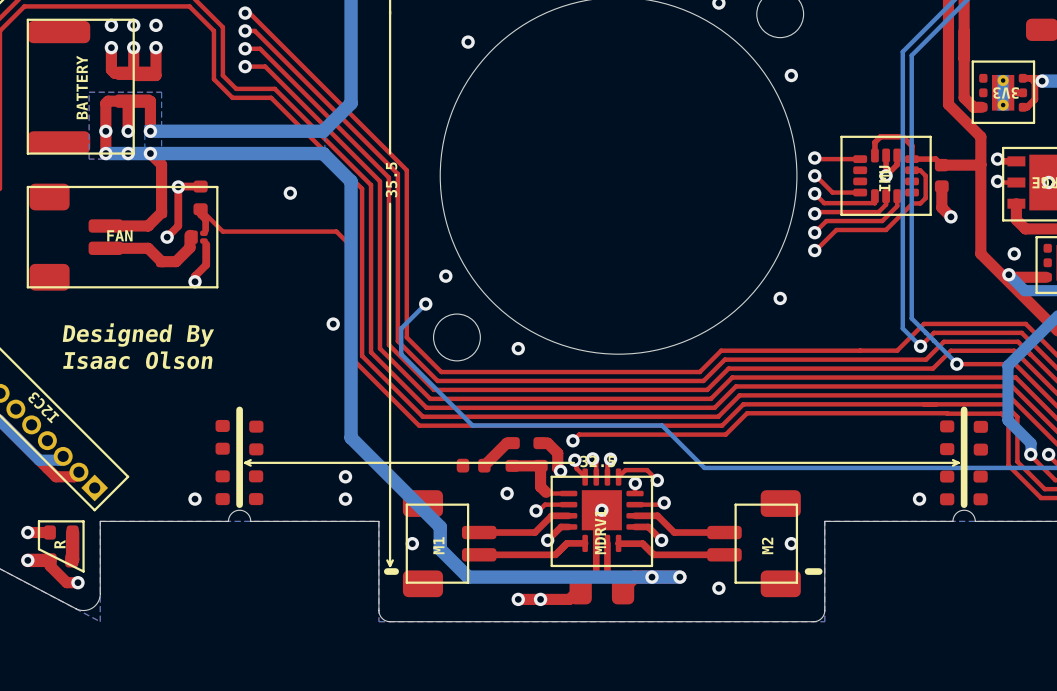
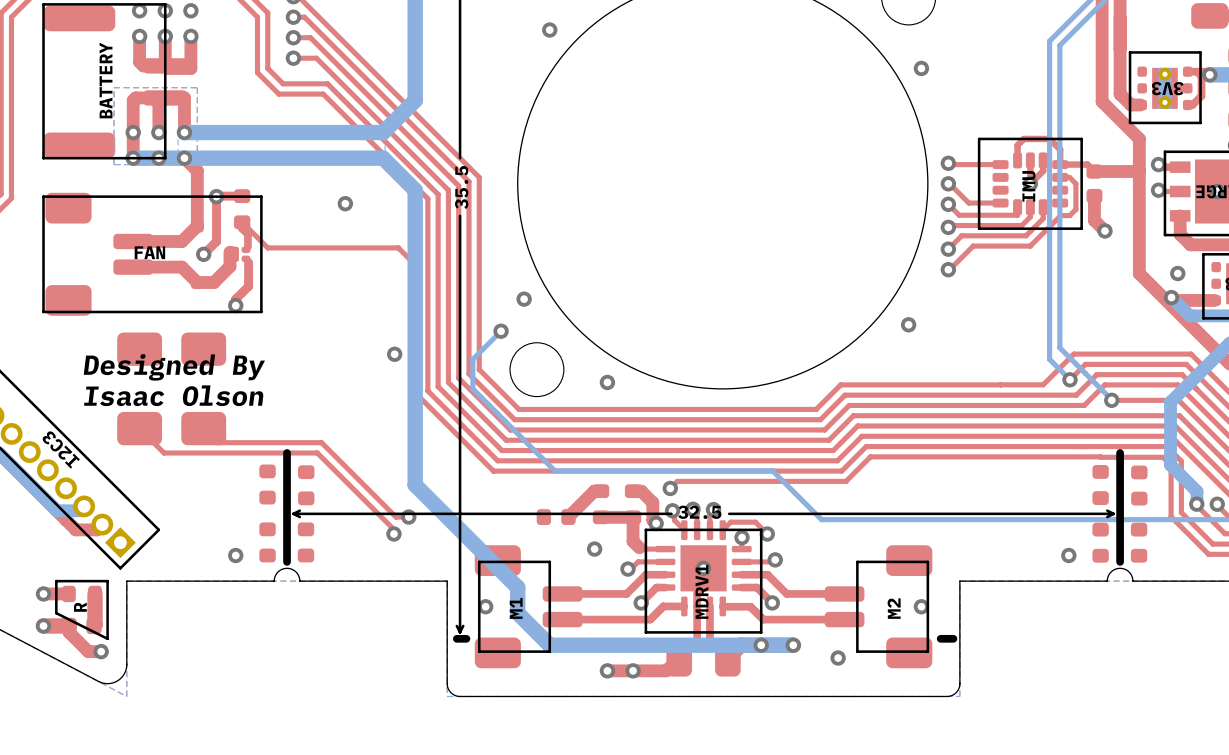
part: none -> (139, 388)
part: none -> (203, 388)
top track: none -> (139, 428) (164, 452) (317, 452) (393, 529) (393, 533)
top track: none -> (203, 428) (217, 442) (321, 442) (395, 517) (408, 517)
via: none -> (408, 517)
via: (345, 476) -> none
via: none -> (393, 533)
via: (345, 499) -> none

